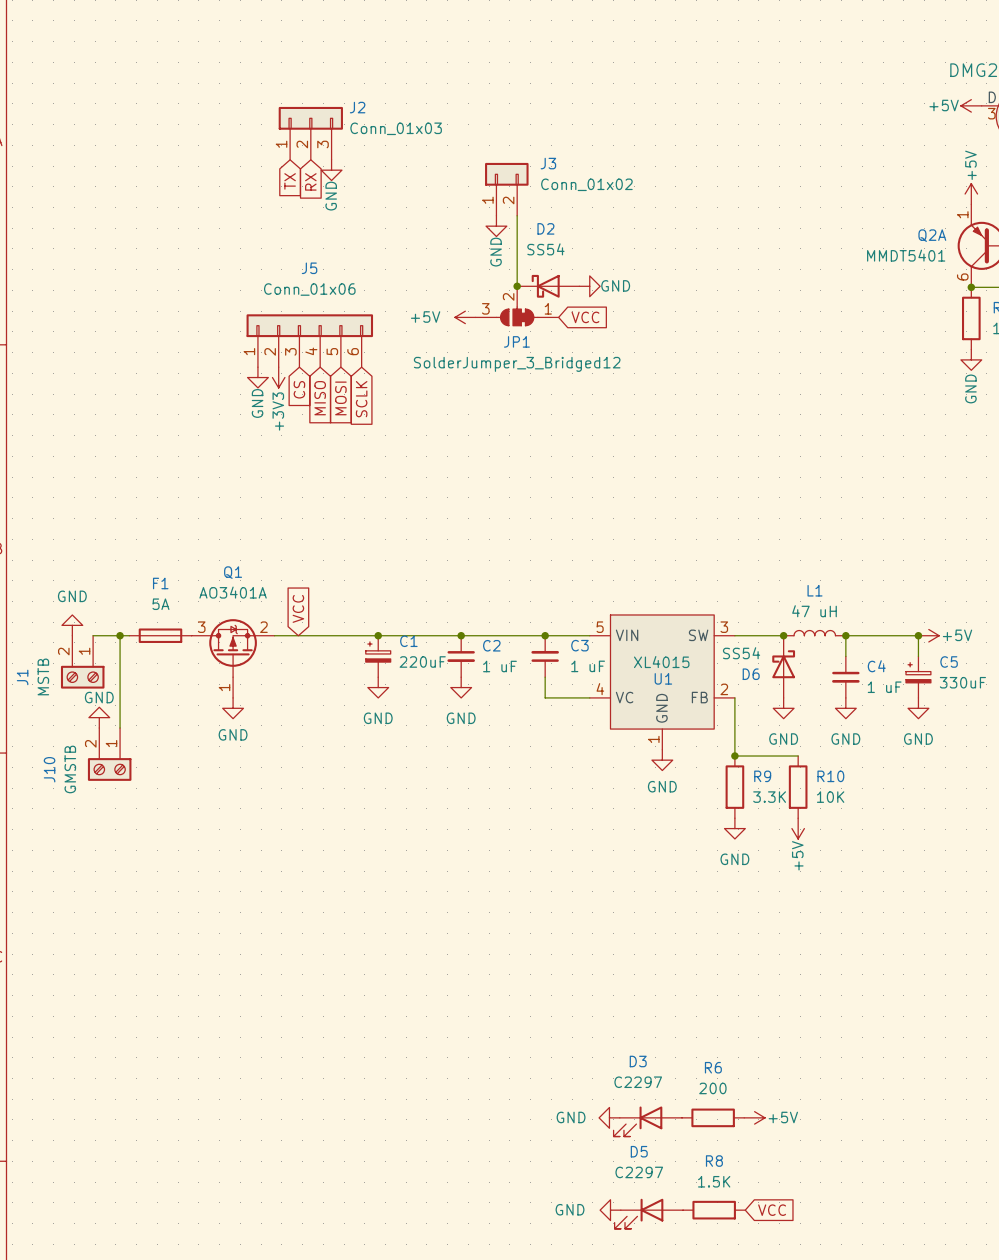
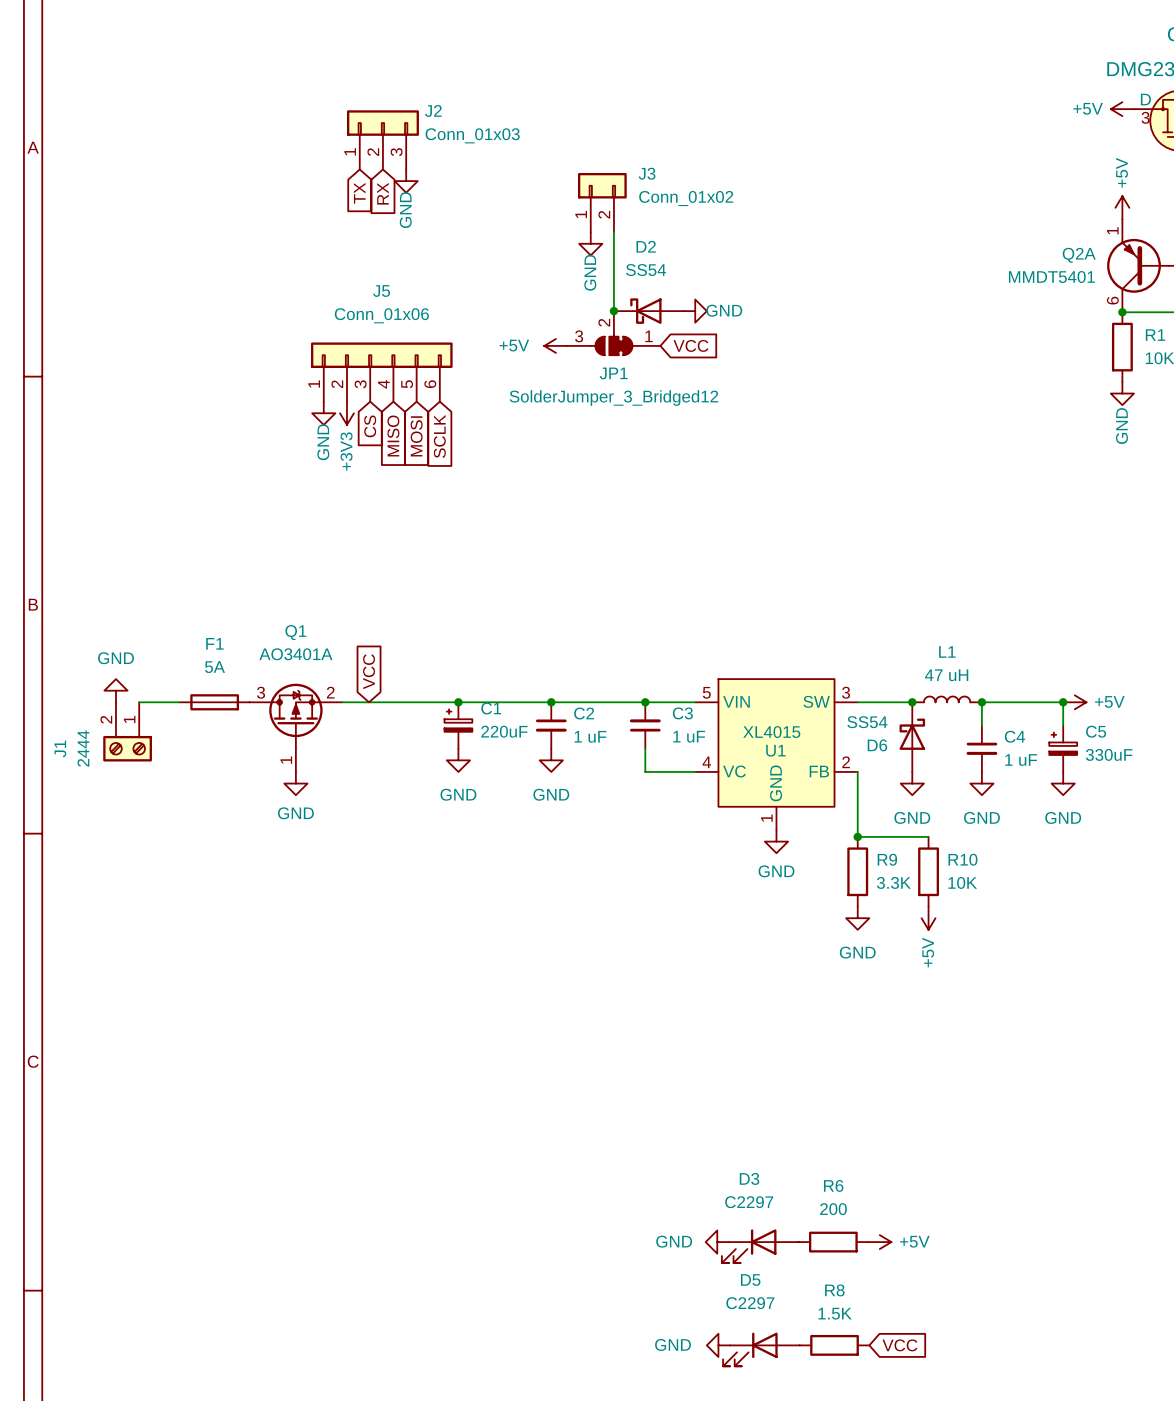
wire: (120, 635) (120, 728) -> none
junction: (120, 635) -> none
J1 value: MSTB (43, 676) -> 2444 (83, 748)
power symbol: GND (99, 717) -> none
J10: GMSTB (109, 754) -> none

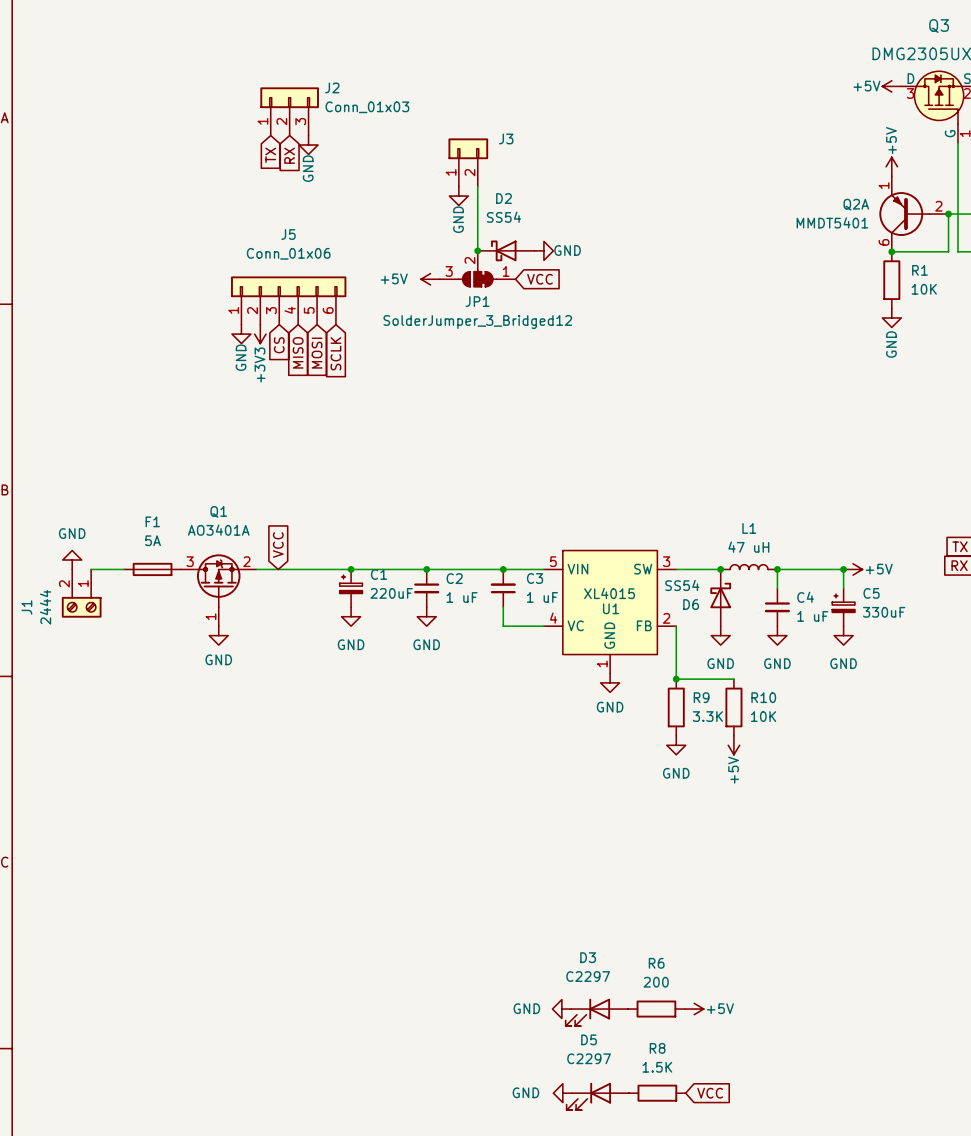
J3 value: Conn_01x02 (686, 198) -> none

